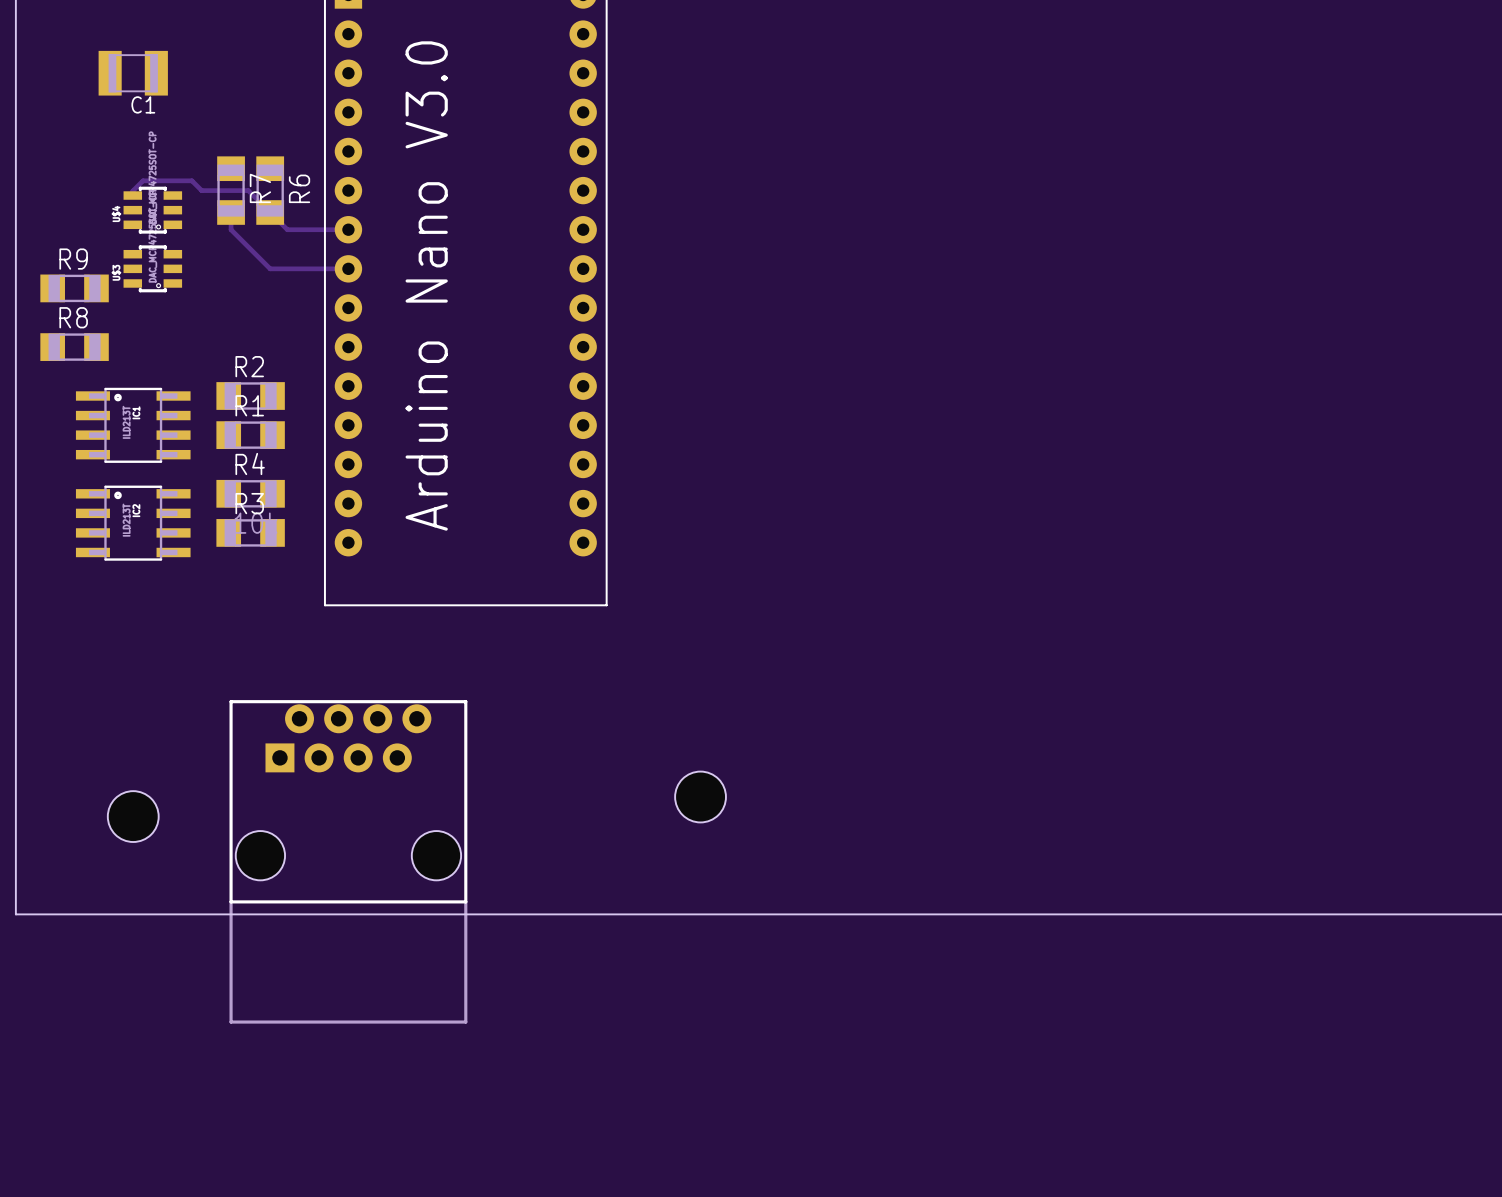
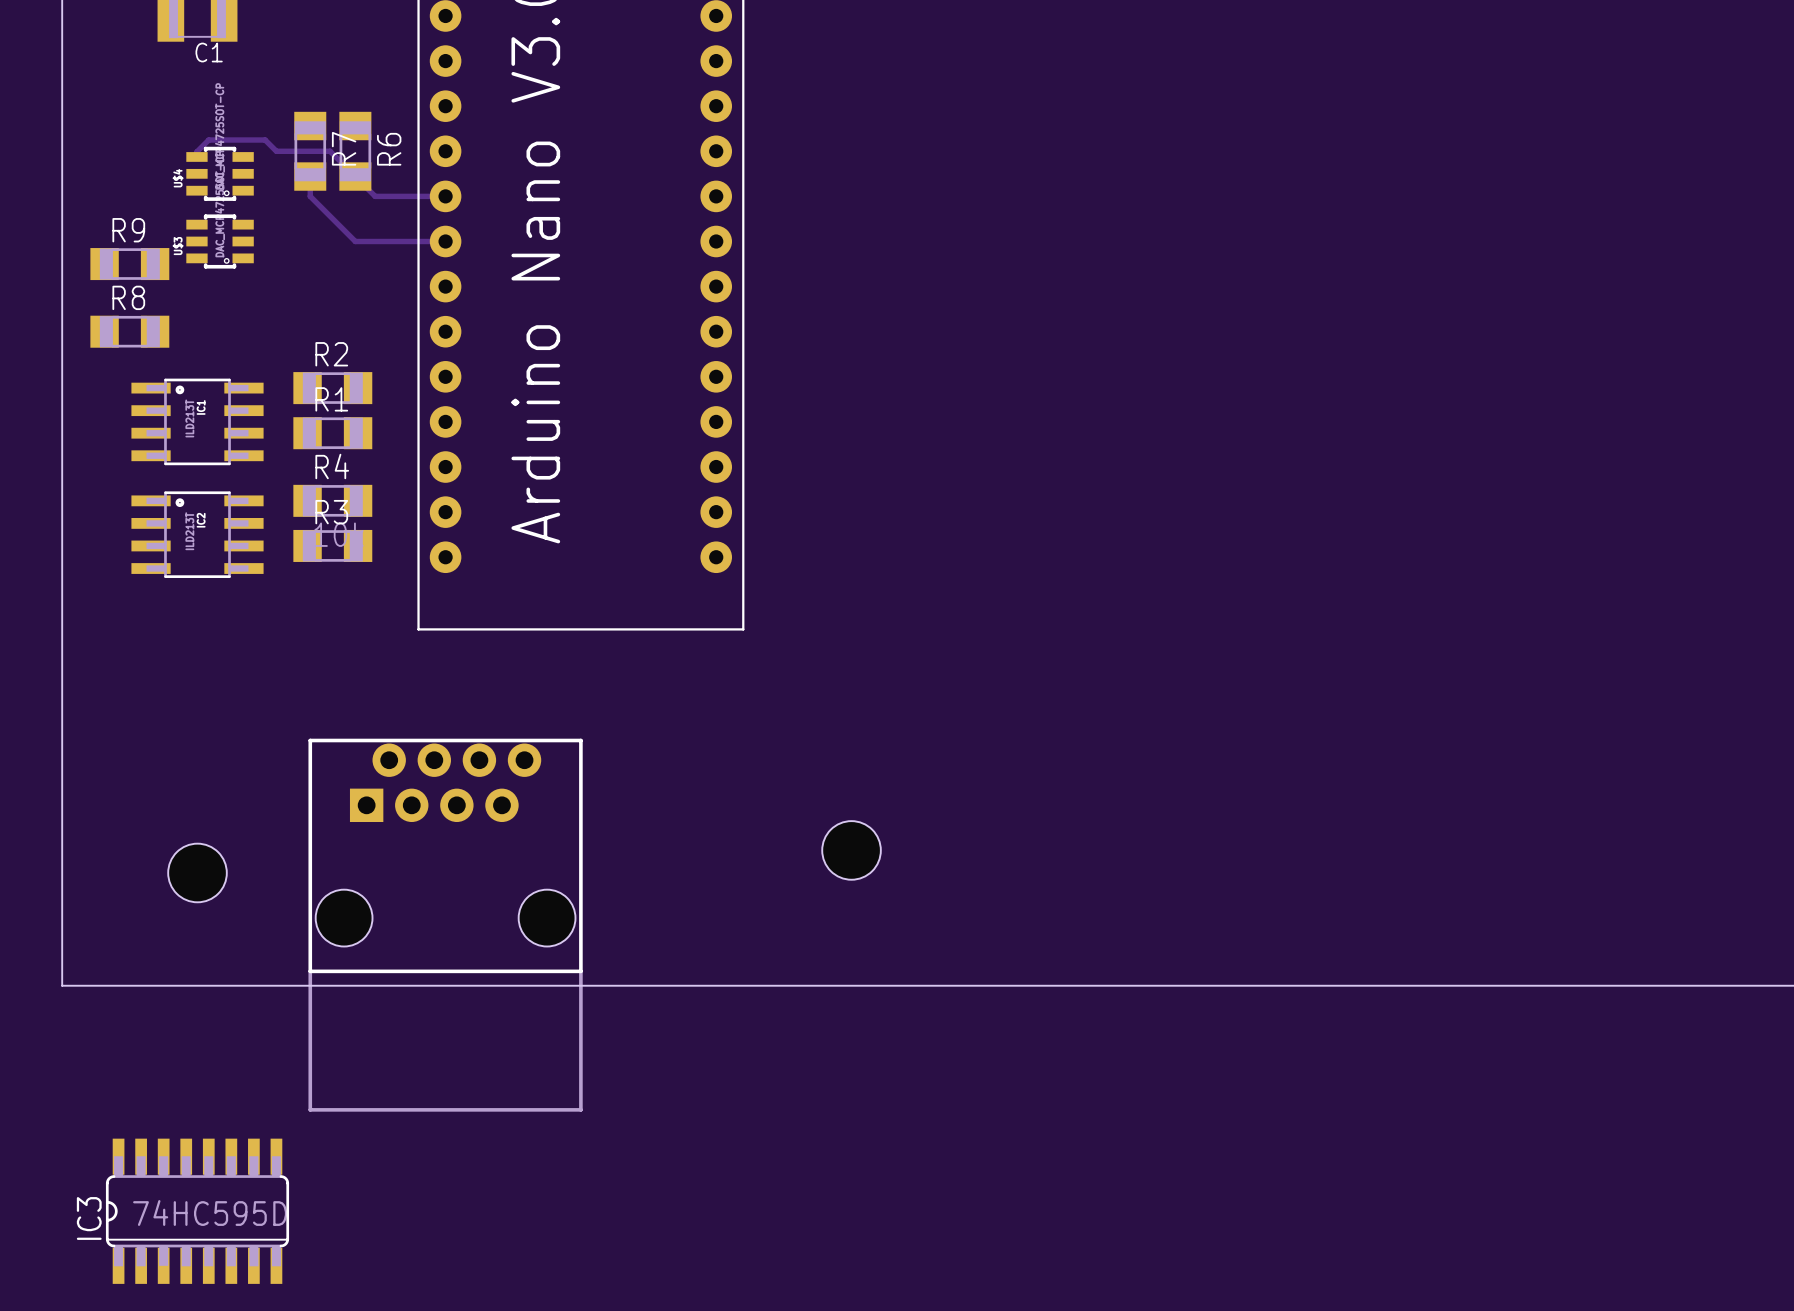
IC3: none -> 74HC595D (197, 1211)

